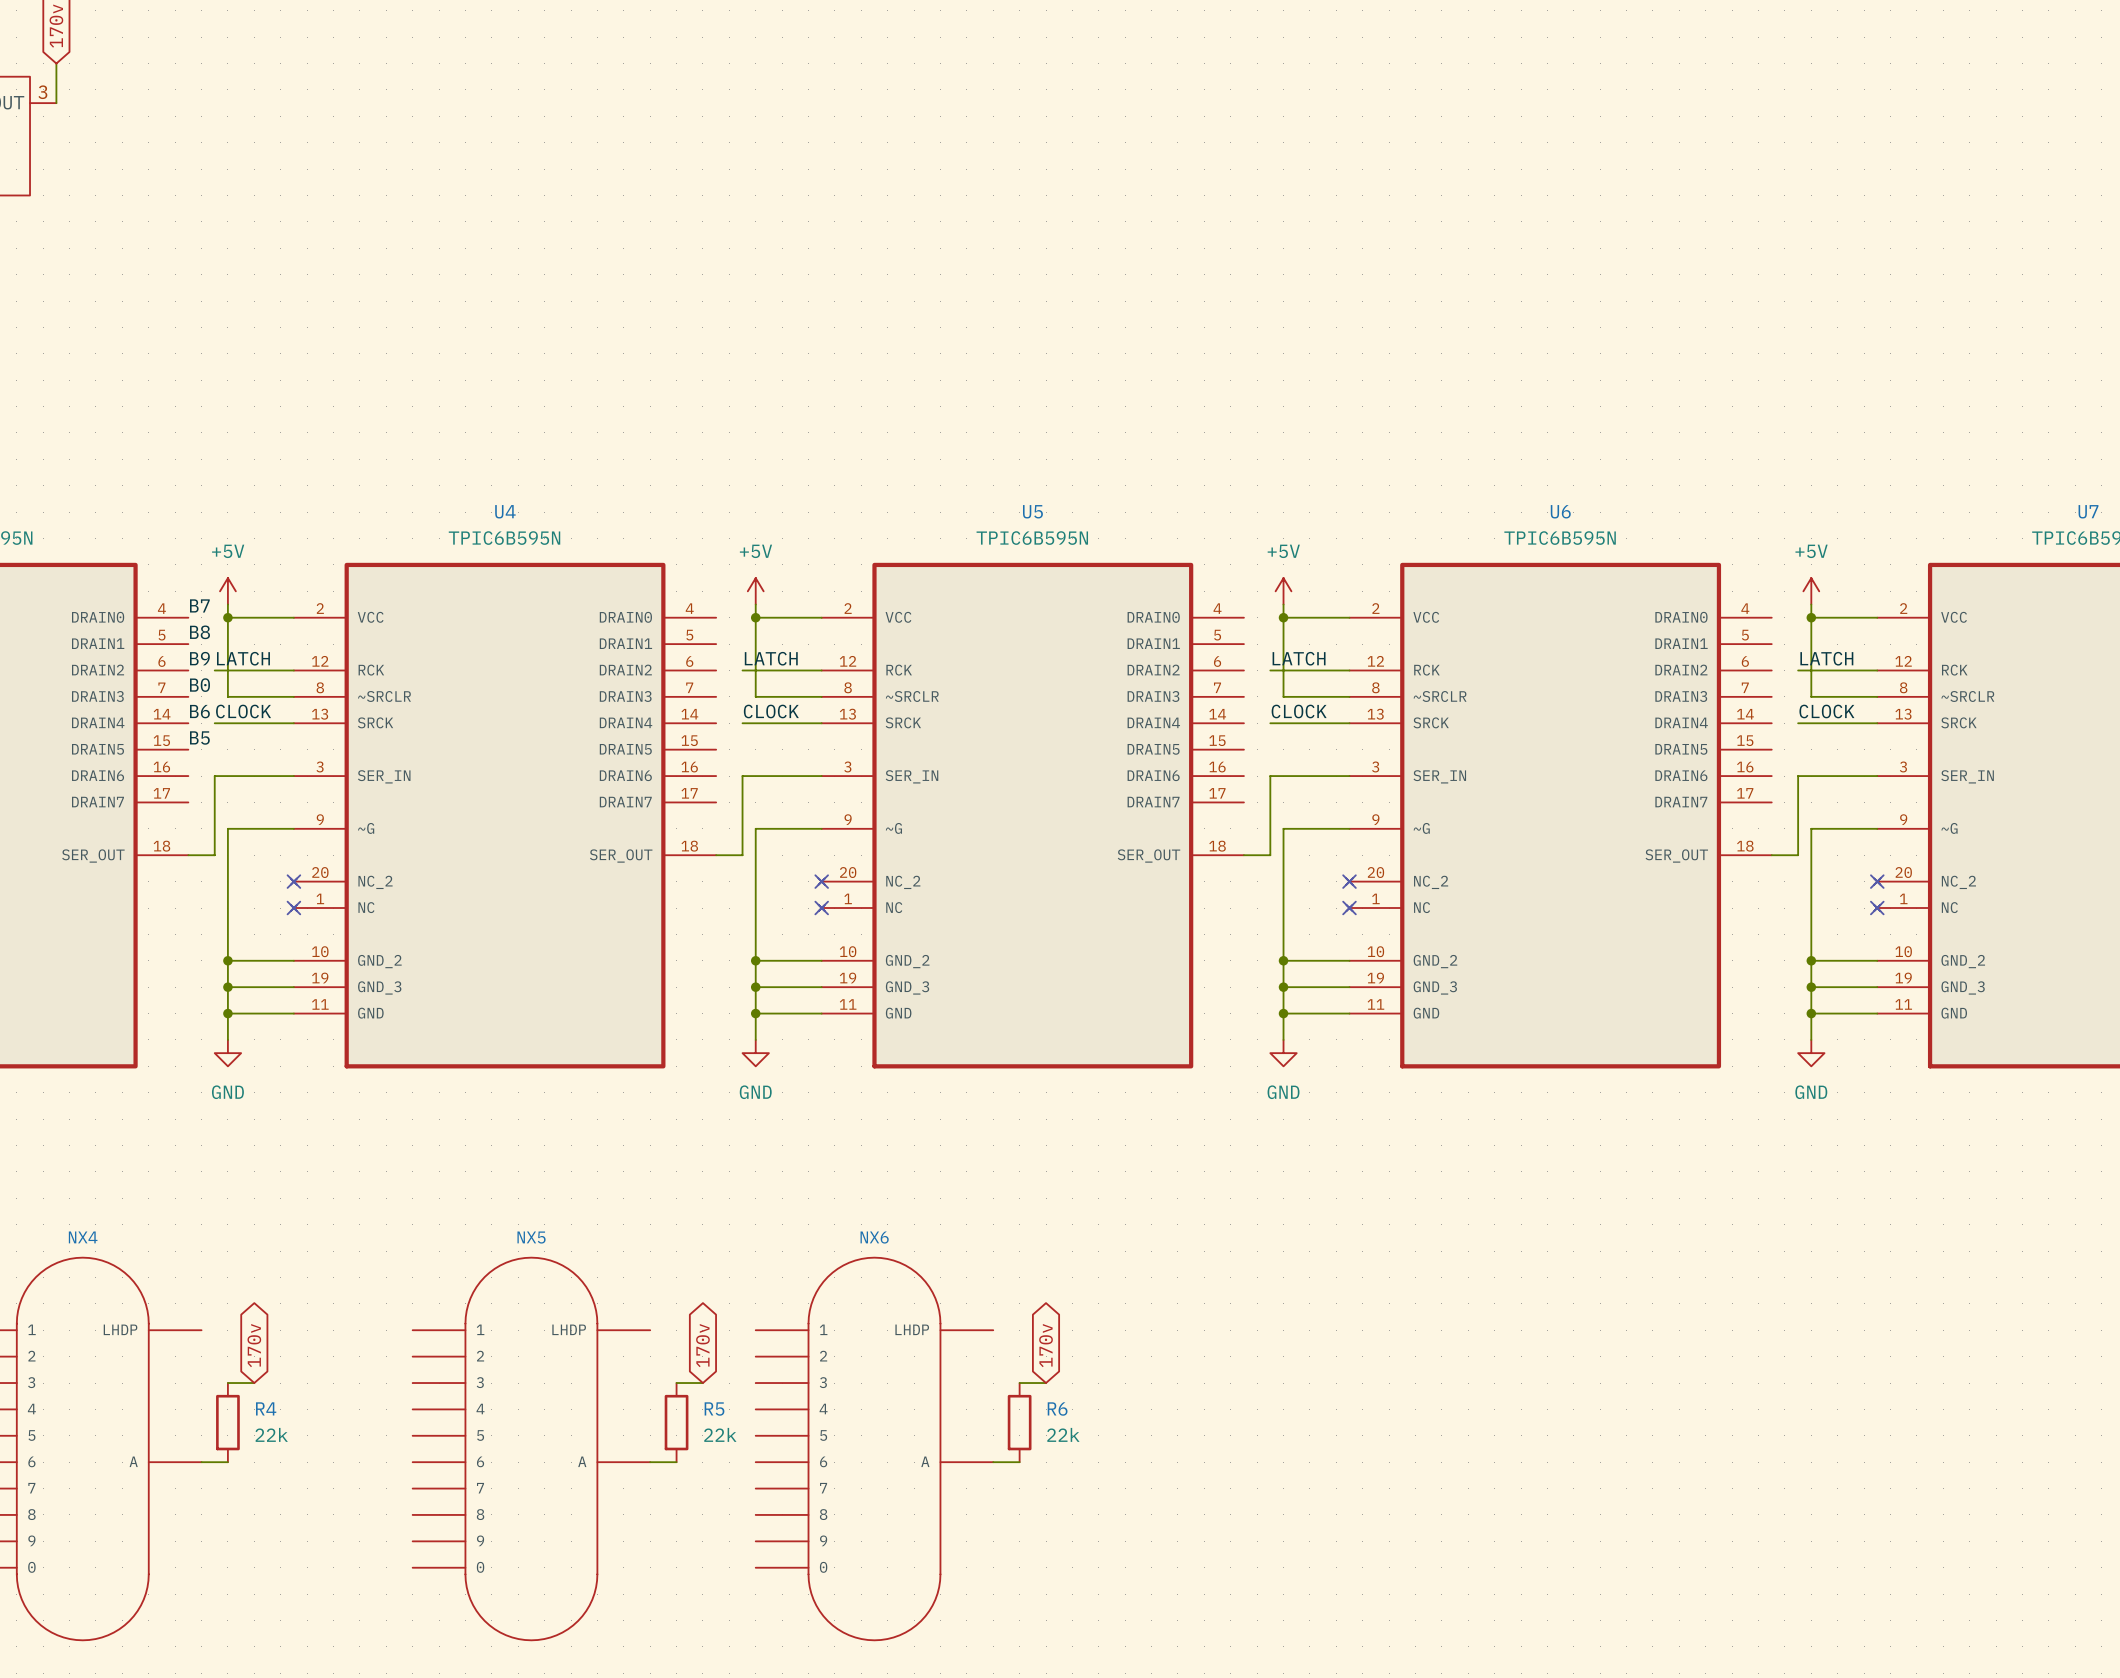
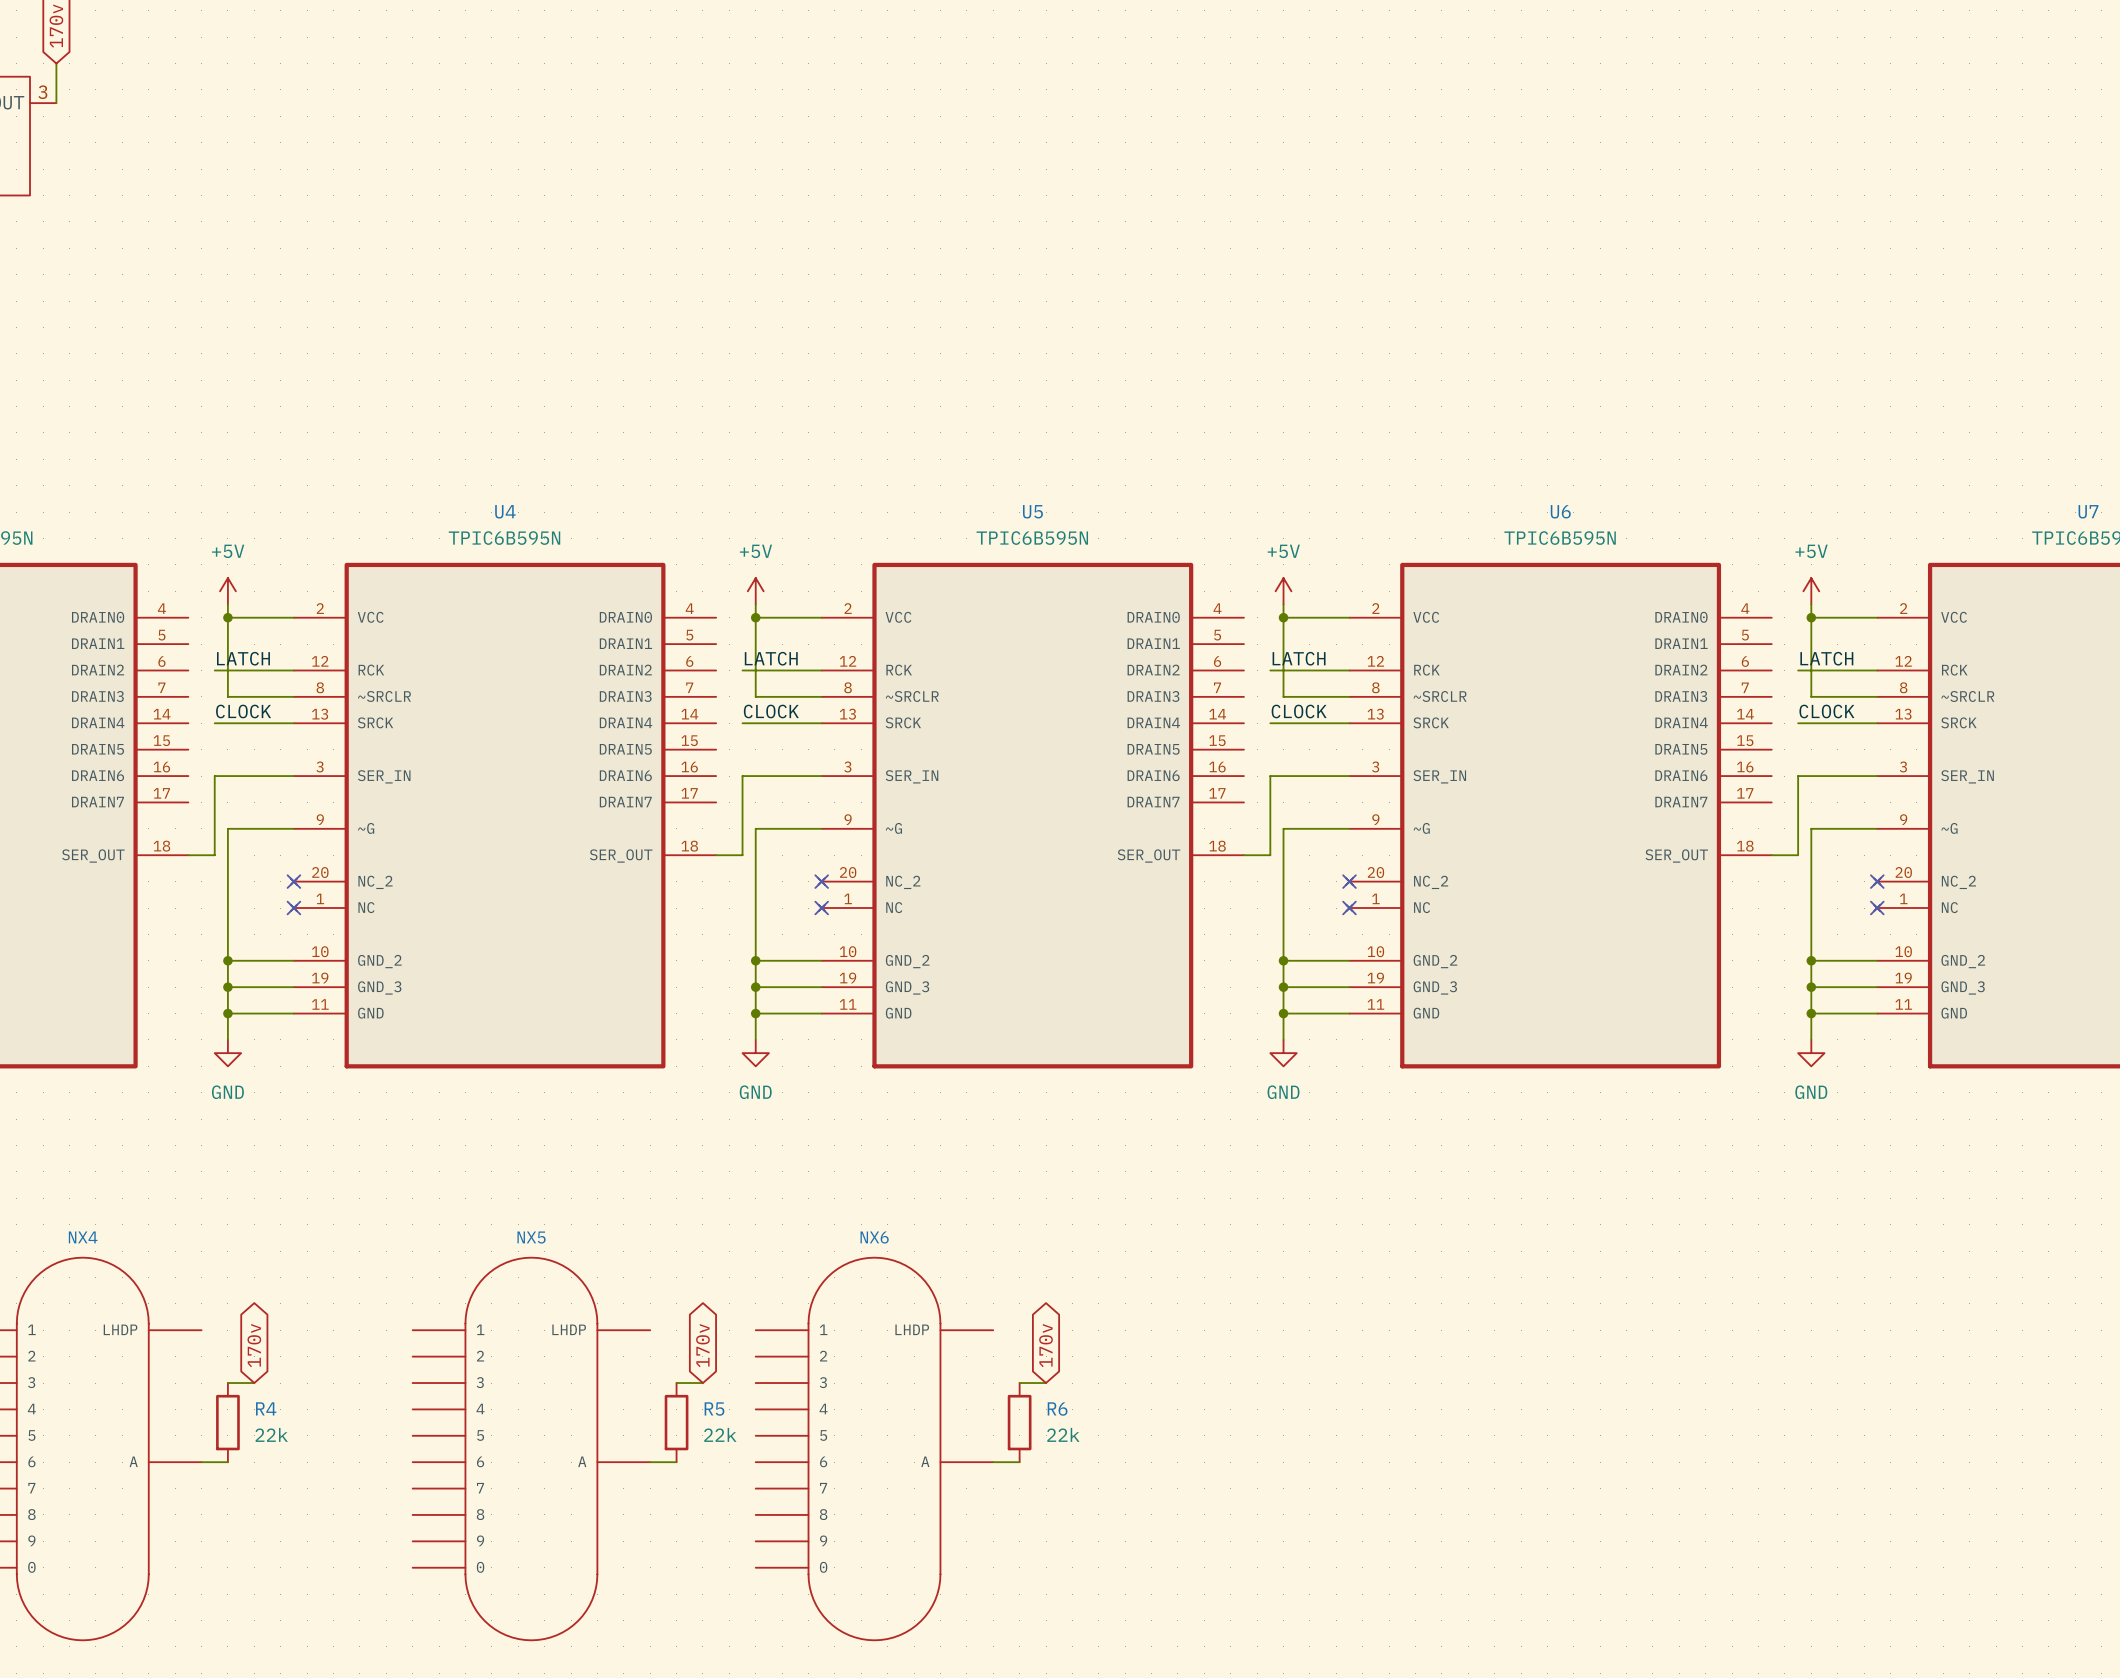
label: B7 (199, 605) -> none
label: B8 (200, 632) -> none
label: B9 (199, 658) -> none
label: B0 (199, 685) -> none
label: B6 (199, 711) -> none
label: B5 (199, 738) -> none

